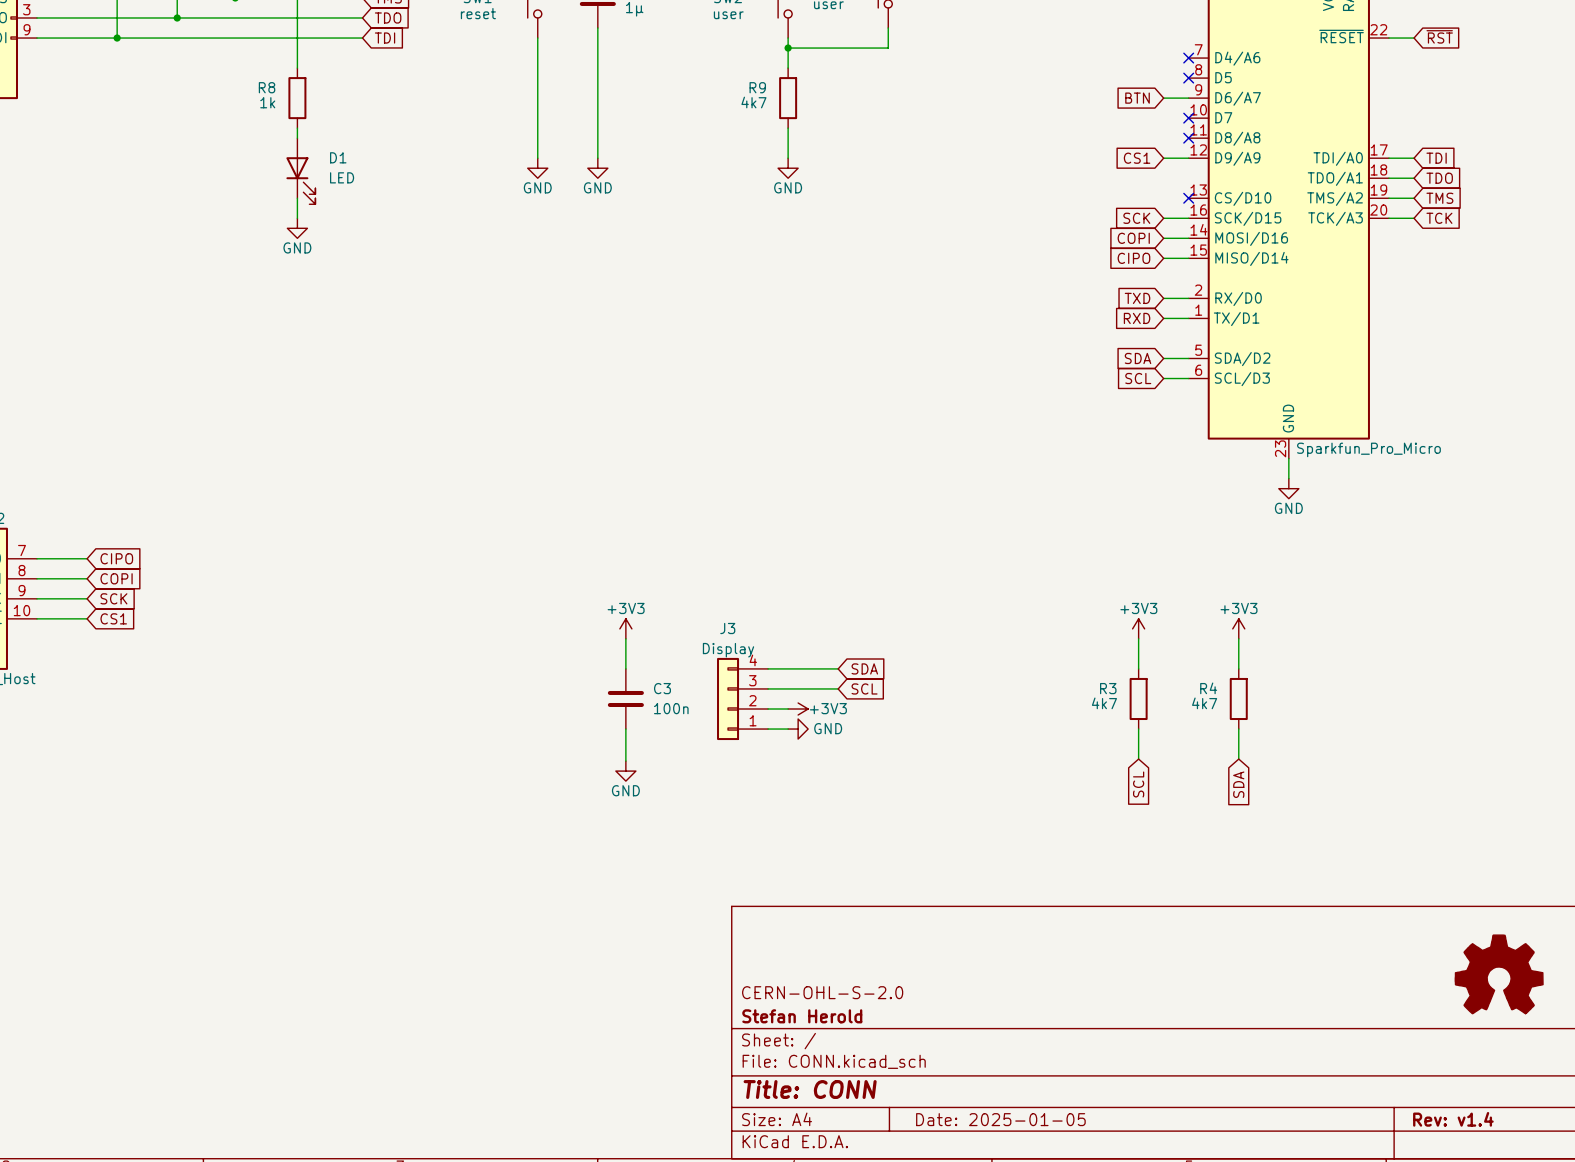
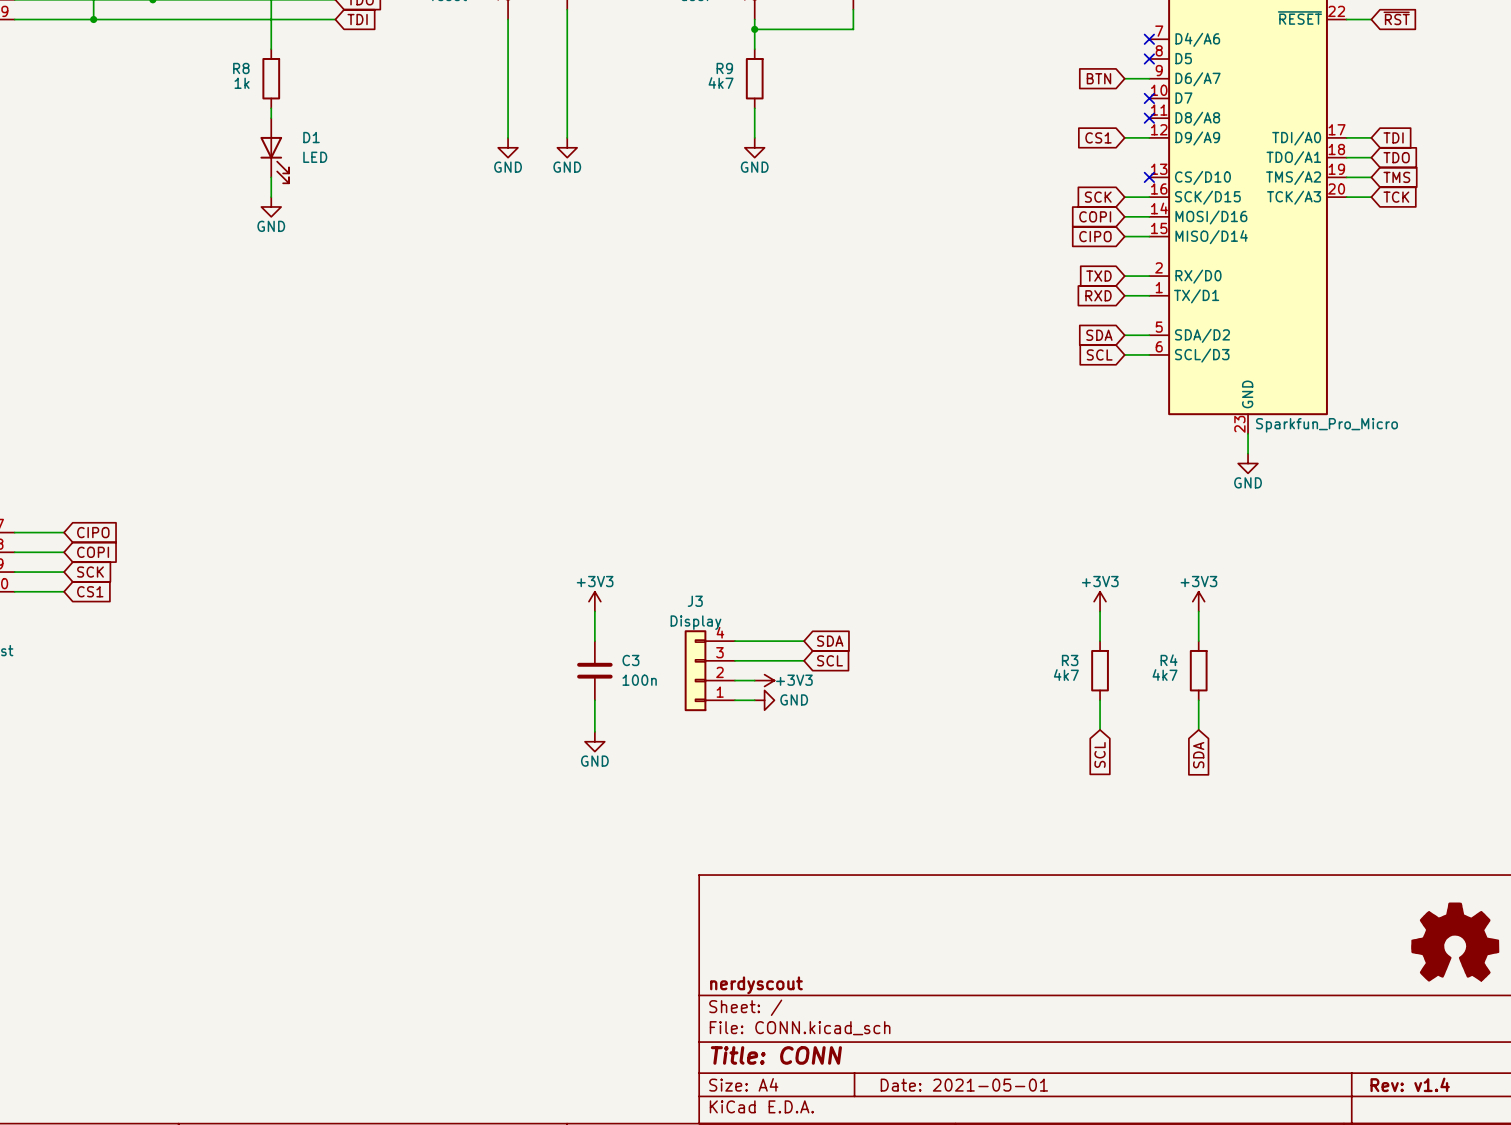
title block: CERN-OHL-S-2.0 (822, 992) -> none
title block: Stefan Herold (802, 1016) -> nerdyscout (756, 985)
title block: Date: 2025-01-05 (1000, 1119) -> Date: 2021-05-01 (964, 1085)

